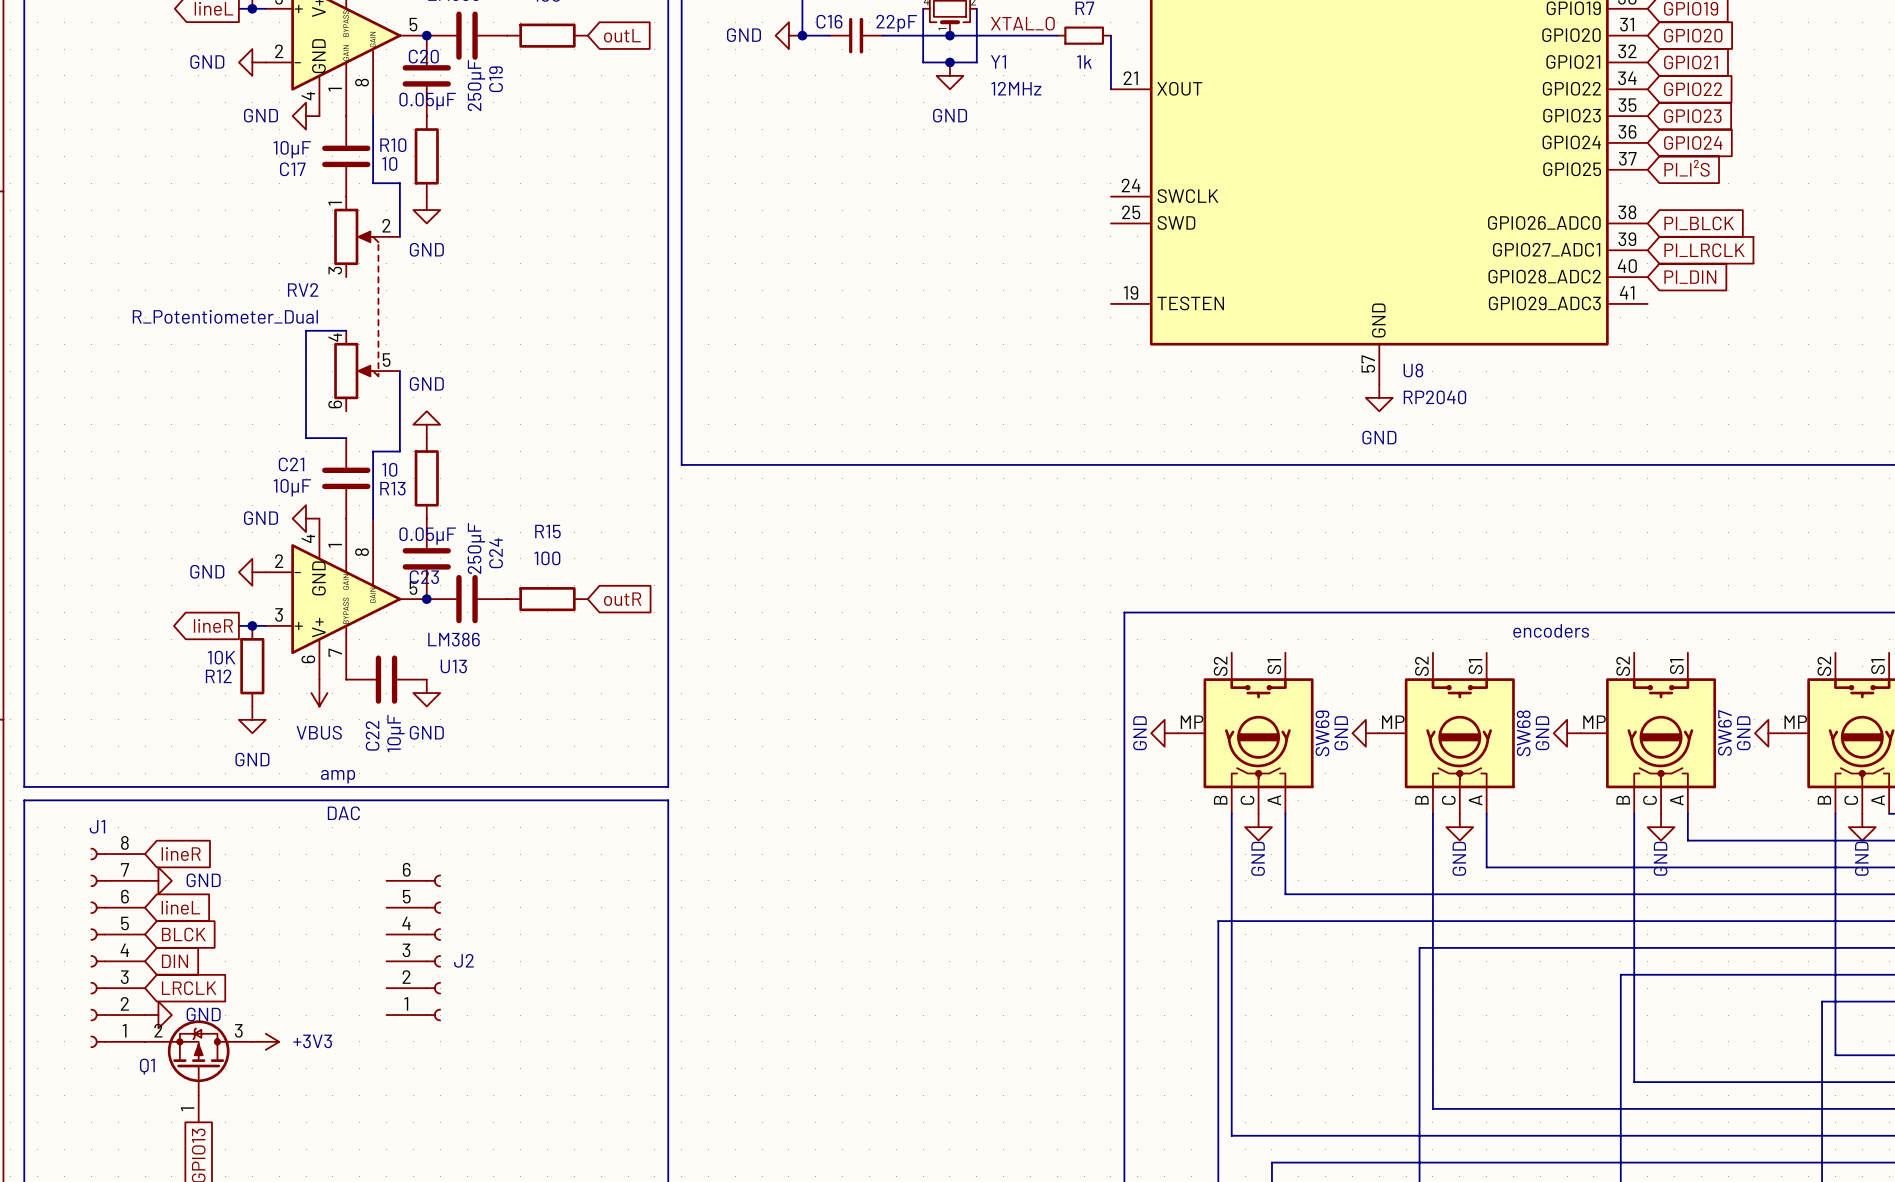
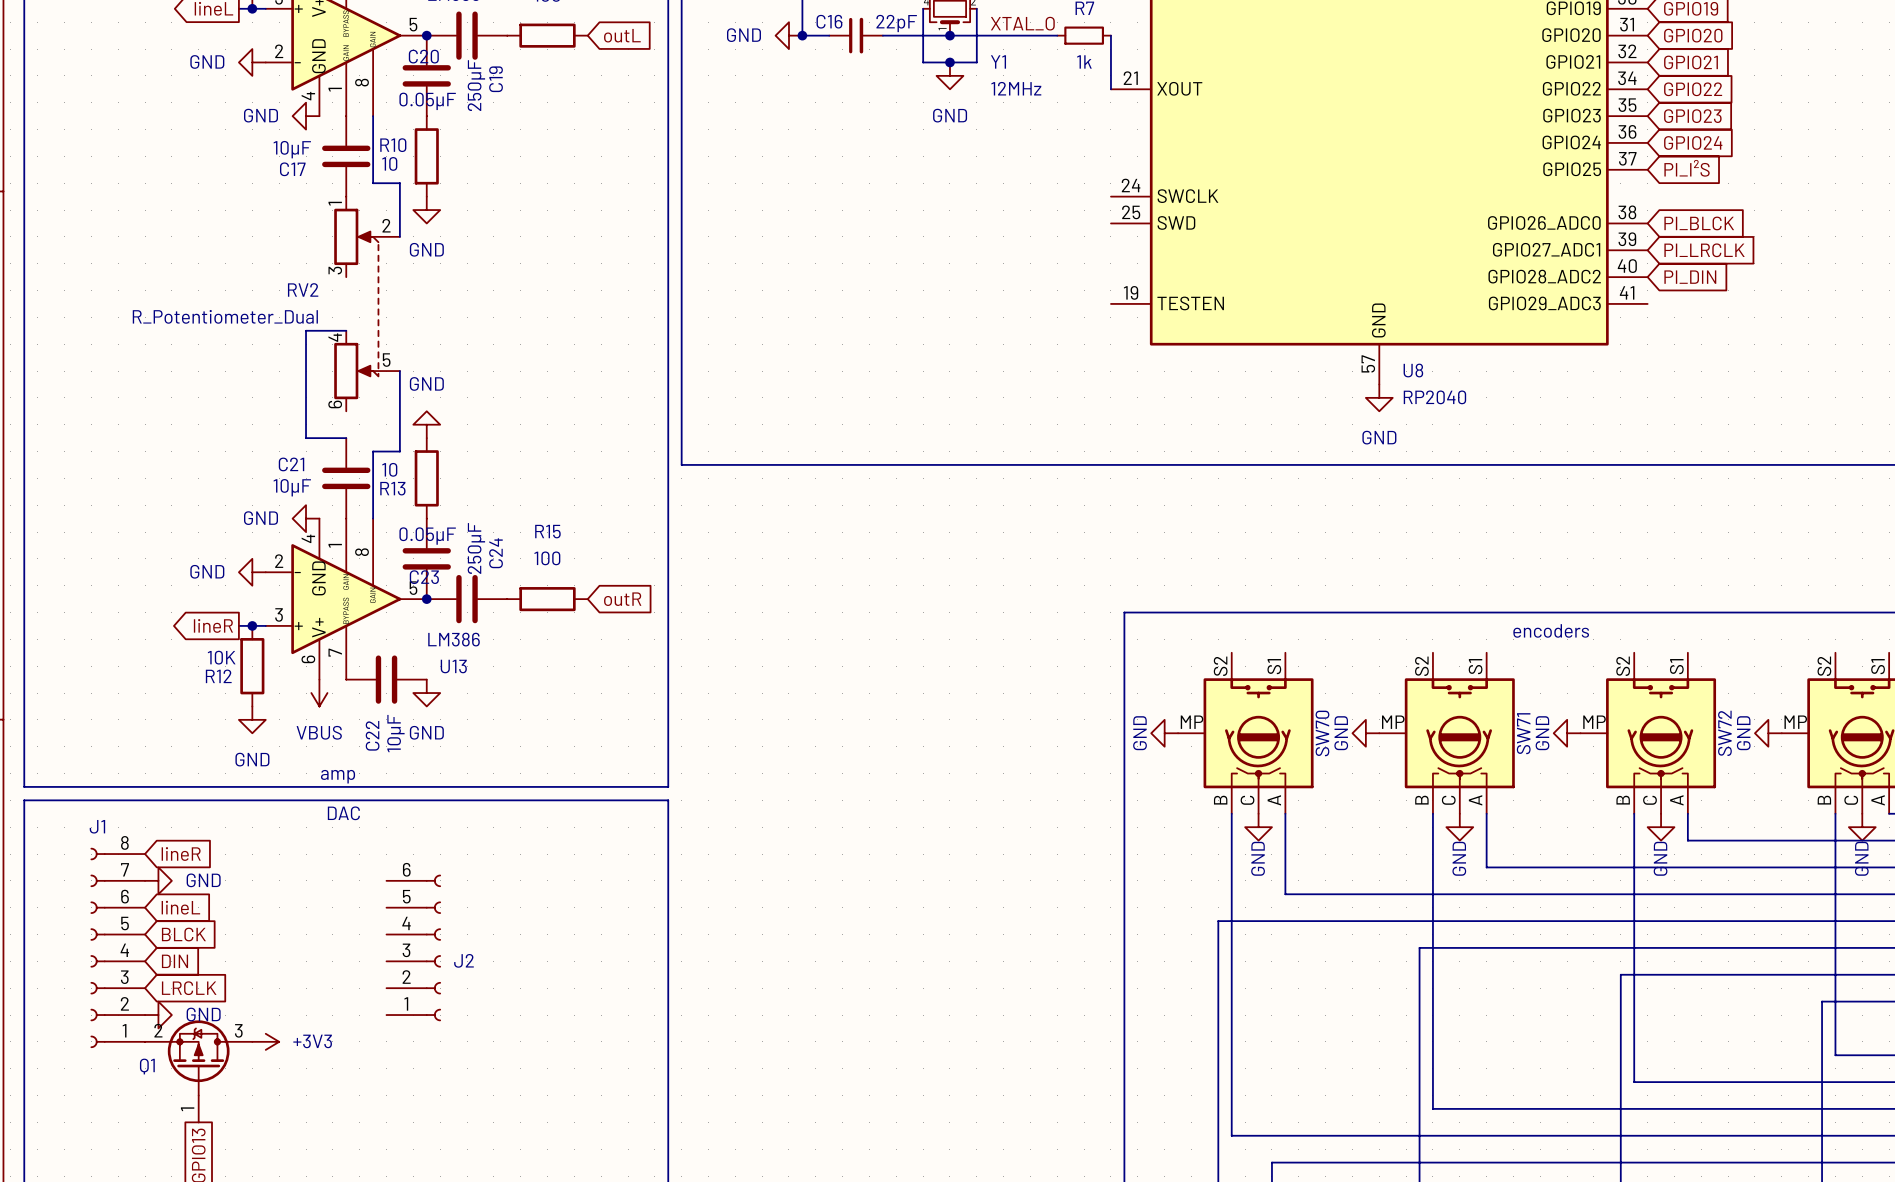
SW67 name: SW67 (1724, 732) -> SW72 (1724, 733)
SW69 name: SW69 (1322, 733) -> SW70 (1322, 733)
SW68 name: SW68 (1523, 733) -> SW71 (1523, 733)

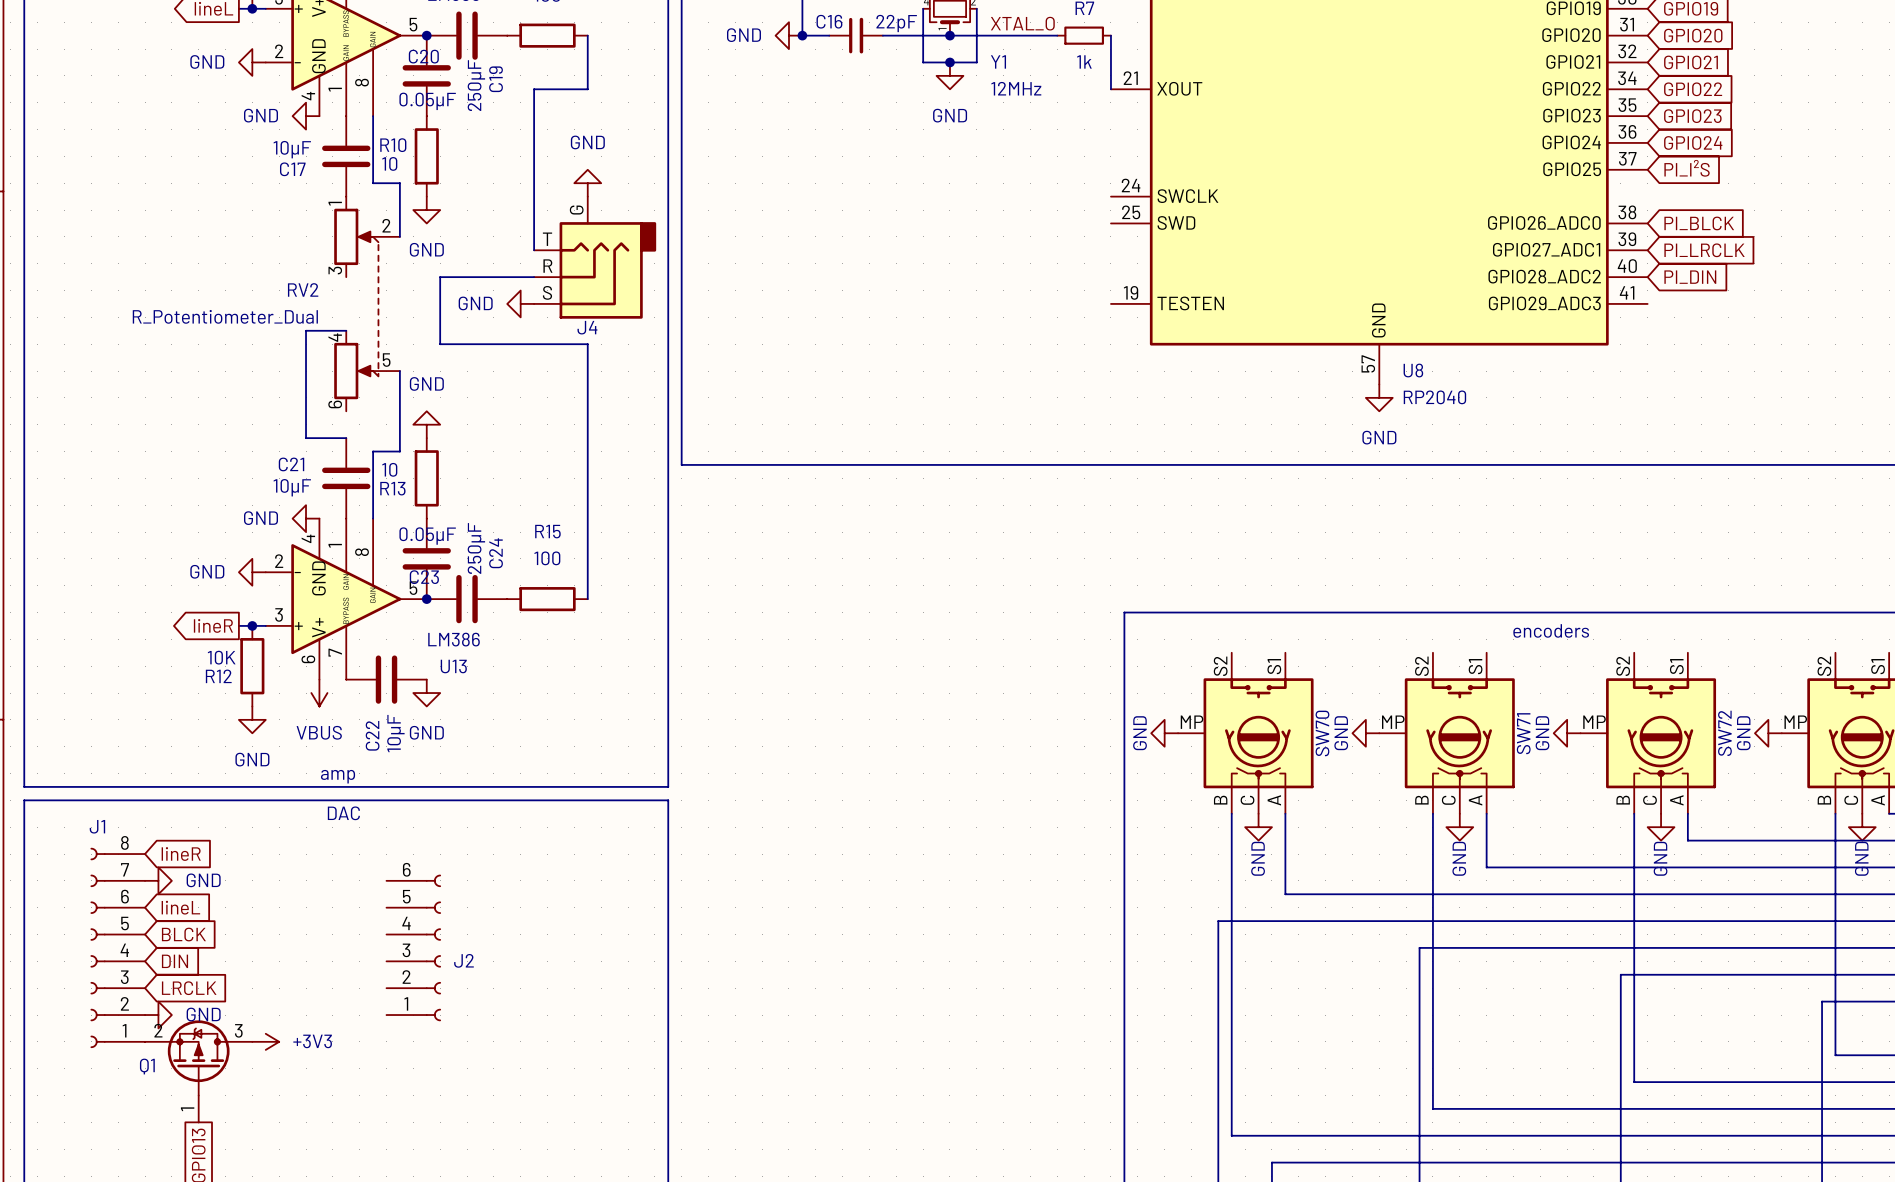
wire: none -> (587, 35) (587, 89) (534, 89) (534, 250)
global label: outL (622, 35) -> none
power symbol: none -> GND (587, 183)
J4: none -> (595, 257)
wire: none -> (534, 277) (440, 277) (440, 344) (587, 344) (587, 599)
power symbol: none -> GND (520, 303)
global label: outR (622, 599) -> none

